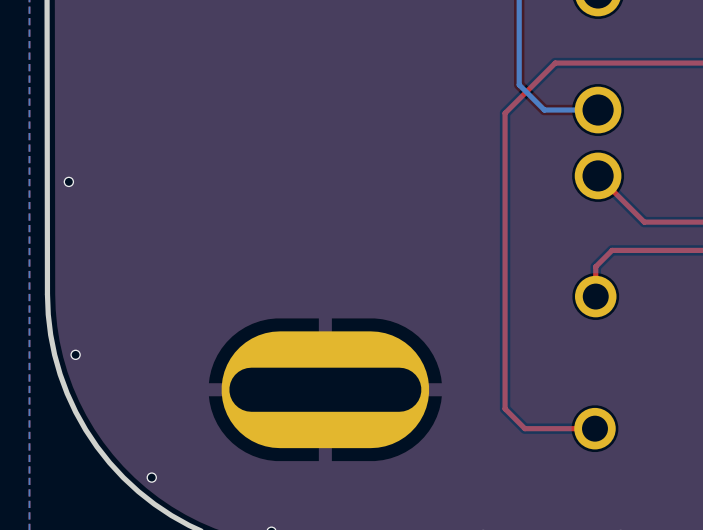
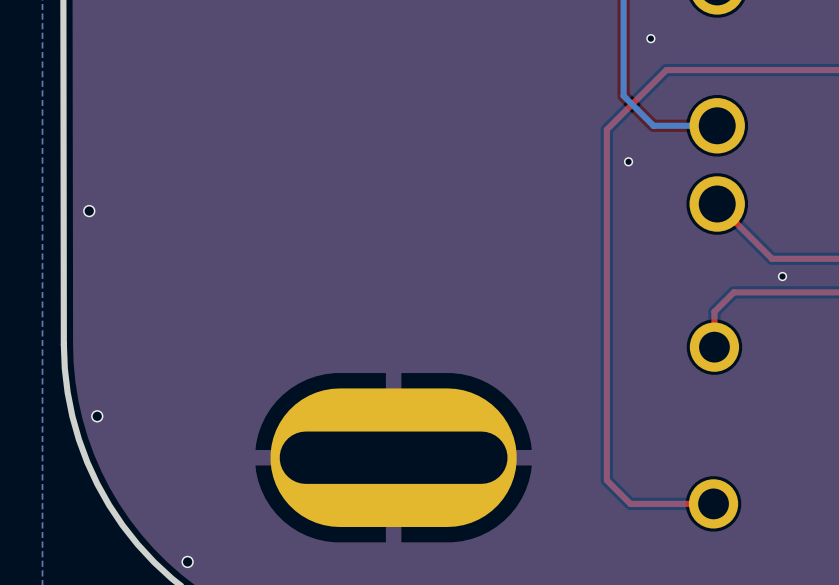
via: none -> (650, 38)
via: none -> (628, 161)
via: none -> (782, 276)

